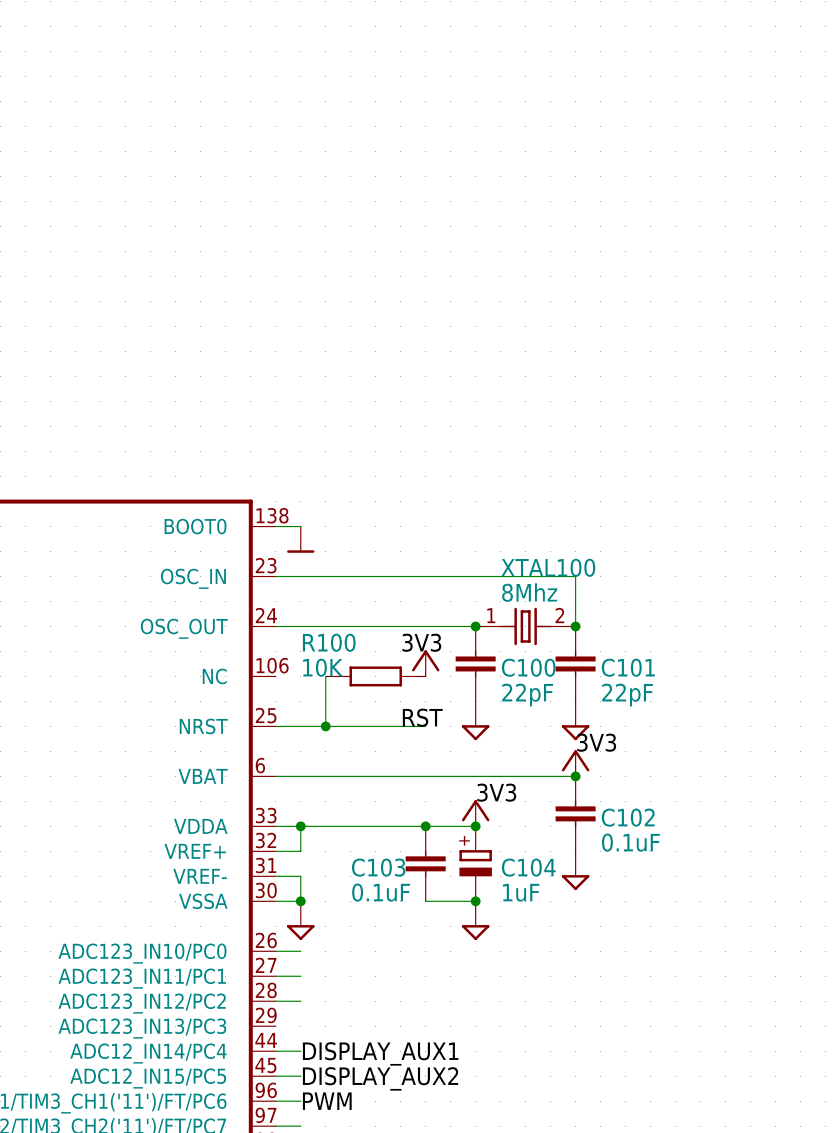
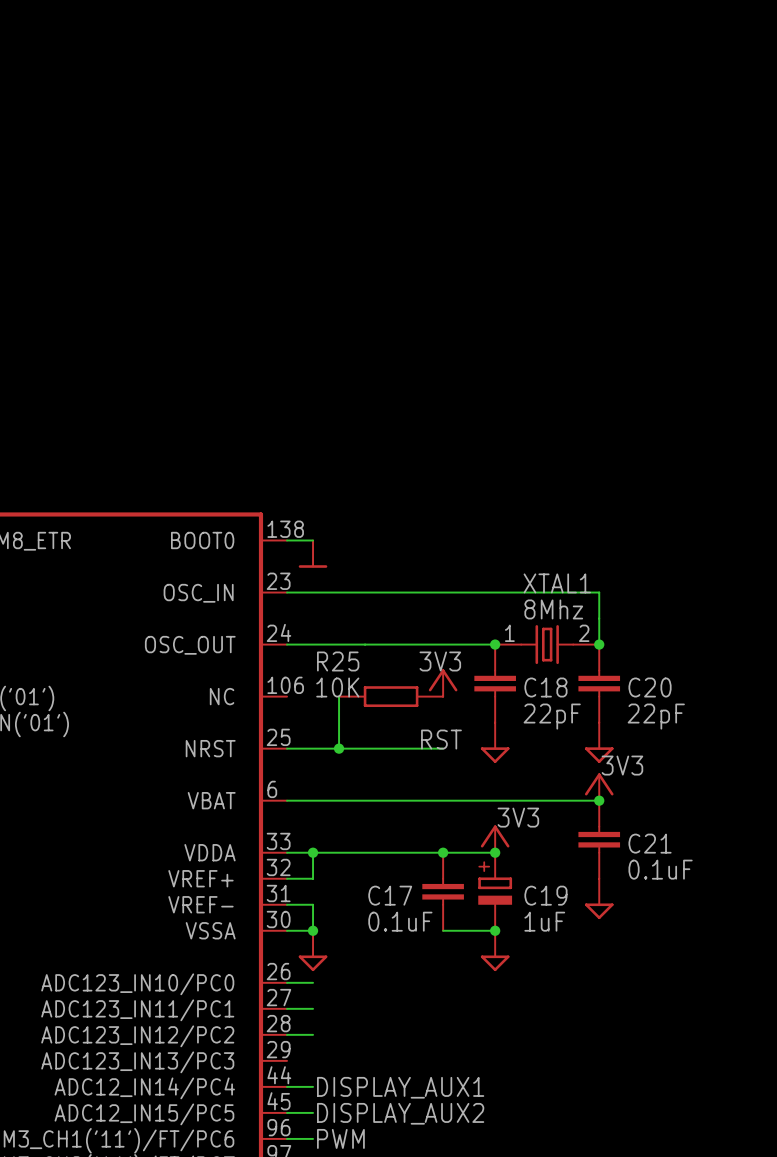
XTAL100 name: XTAL100 (548, 567) -> XTAL1 (557, 583)
R100 name: R100 (329, 642) -> R25 (338, 661)
C100 name: C100 (528, 667) -> C18 (545, 687)
C101 name: C101 (628, 667) -> C20 (650, 687)
C102 name: C102 (628, 817) -> C21 (650, 843)
C103 name: C103 (378, 867) -> C17 (390, 895)
C104 name: C104 (528, 867) -> C19 (545, 895)

